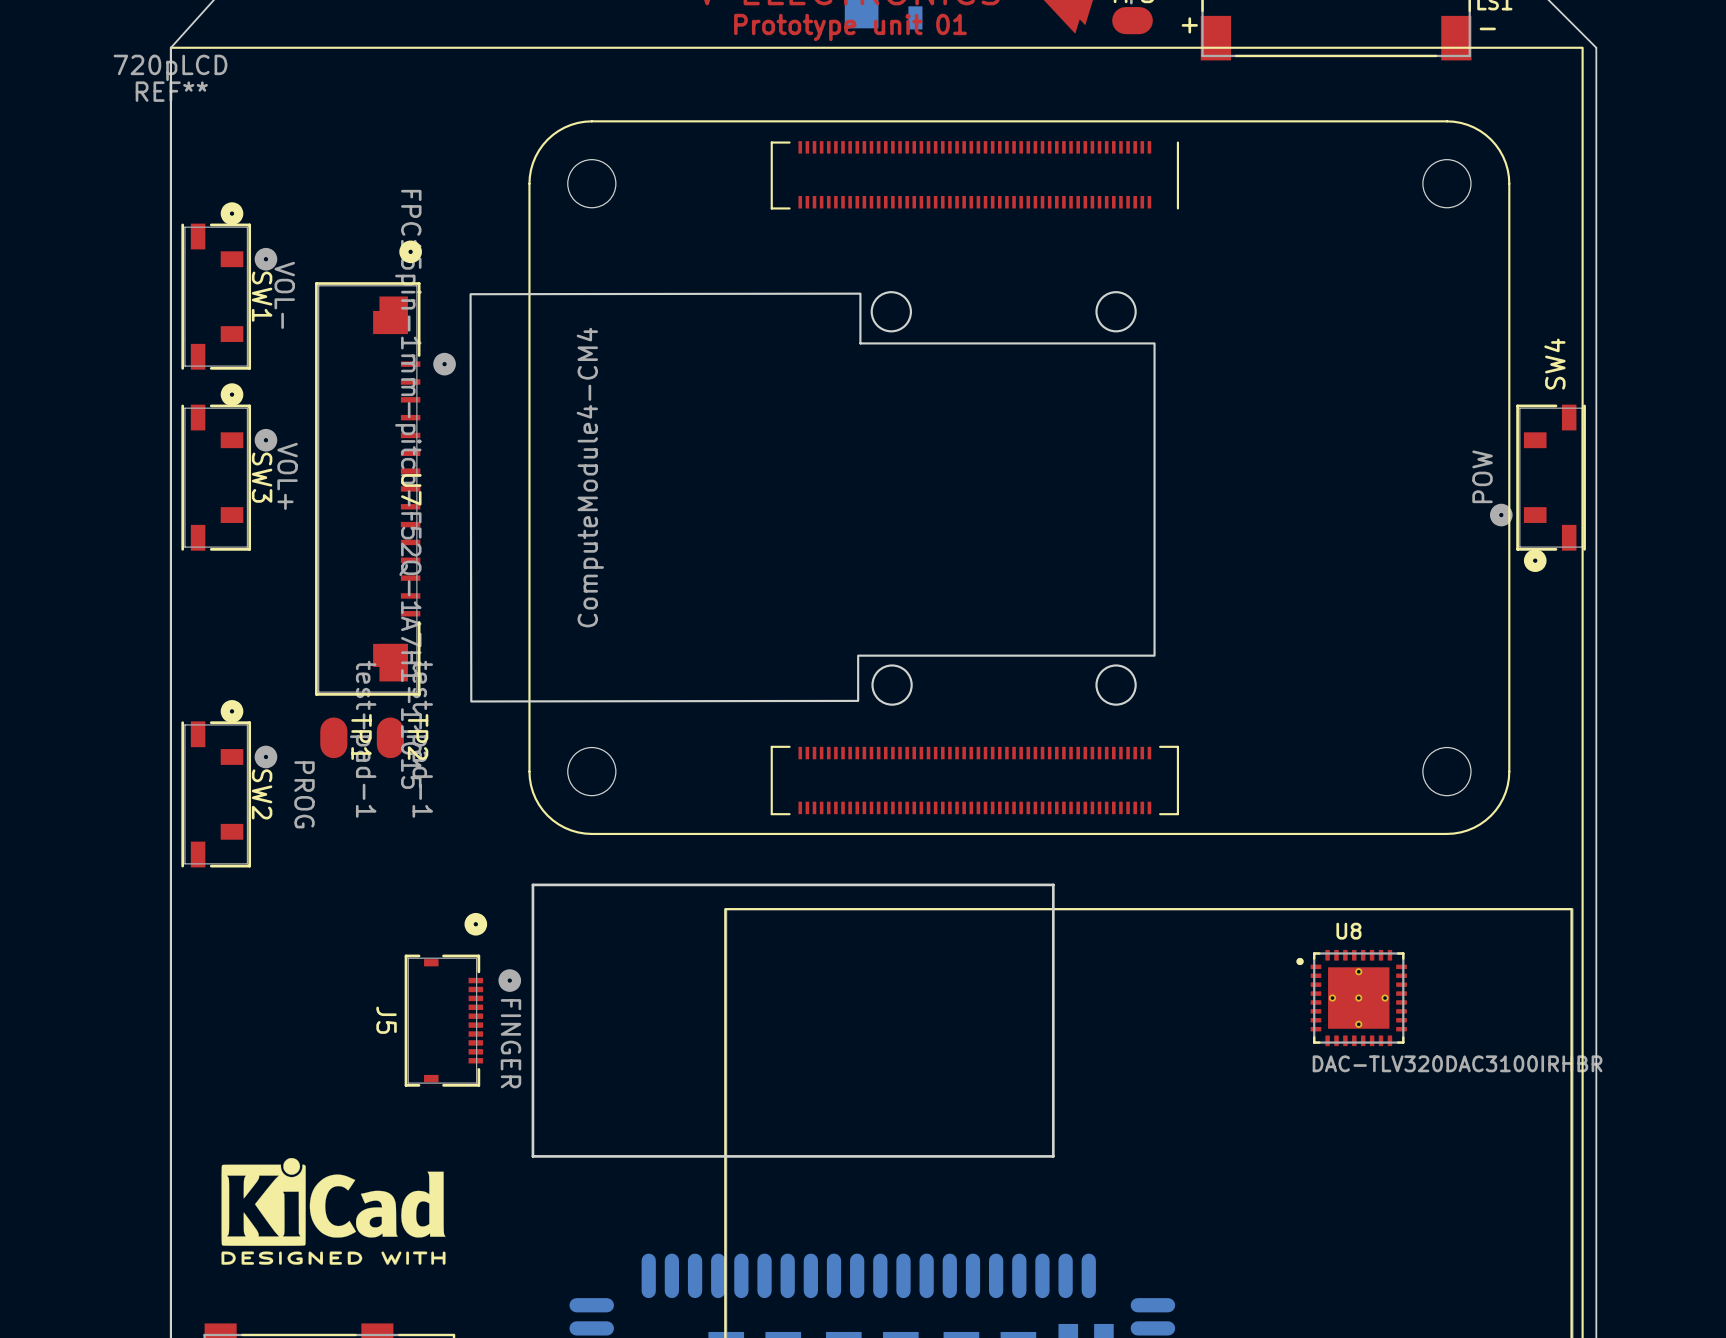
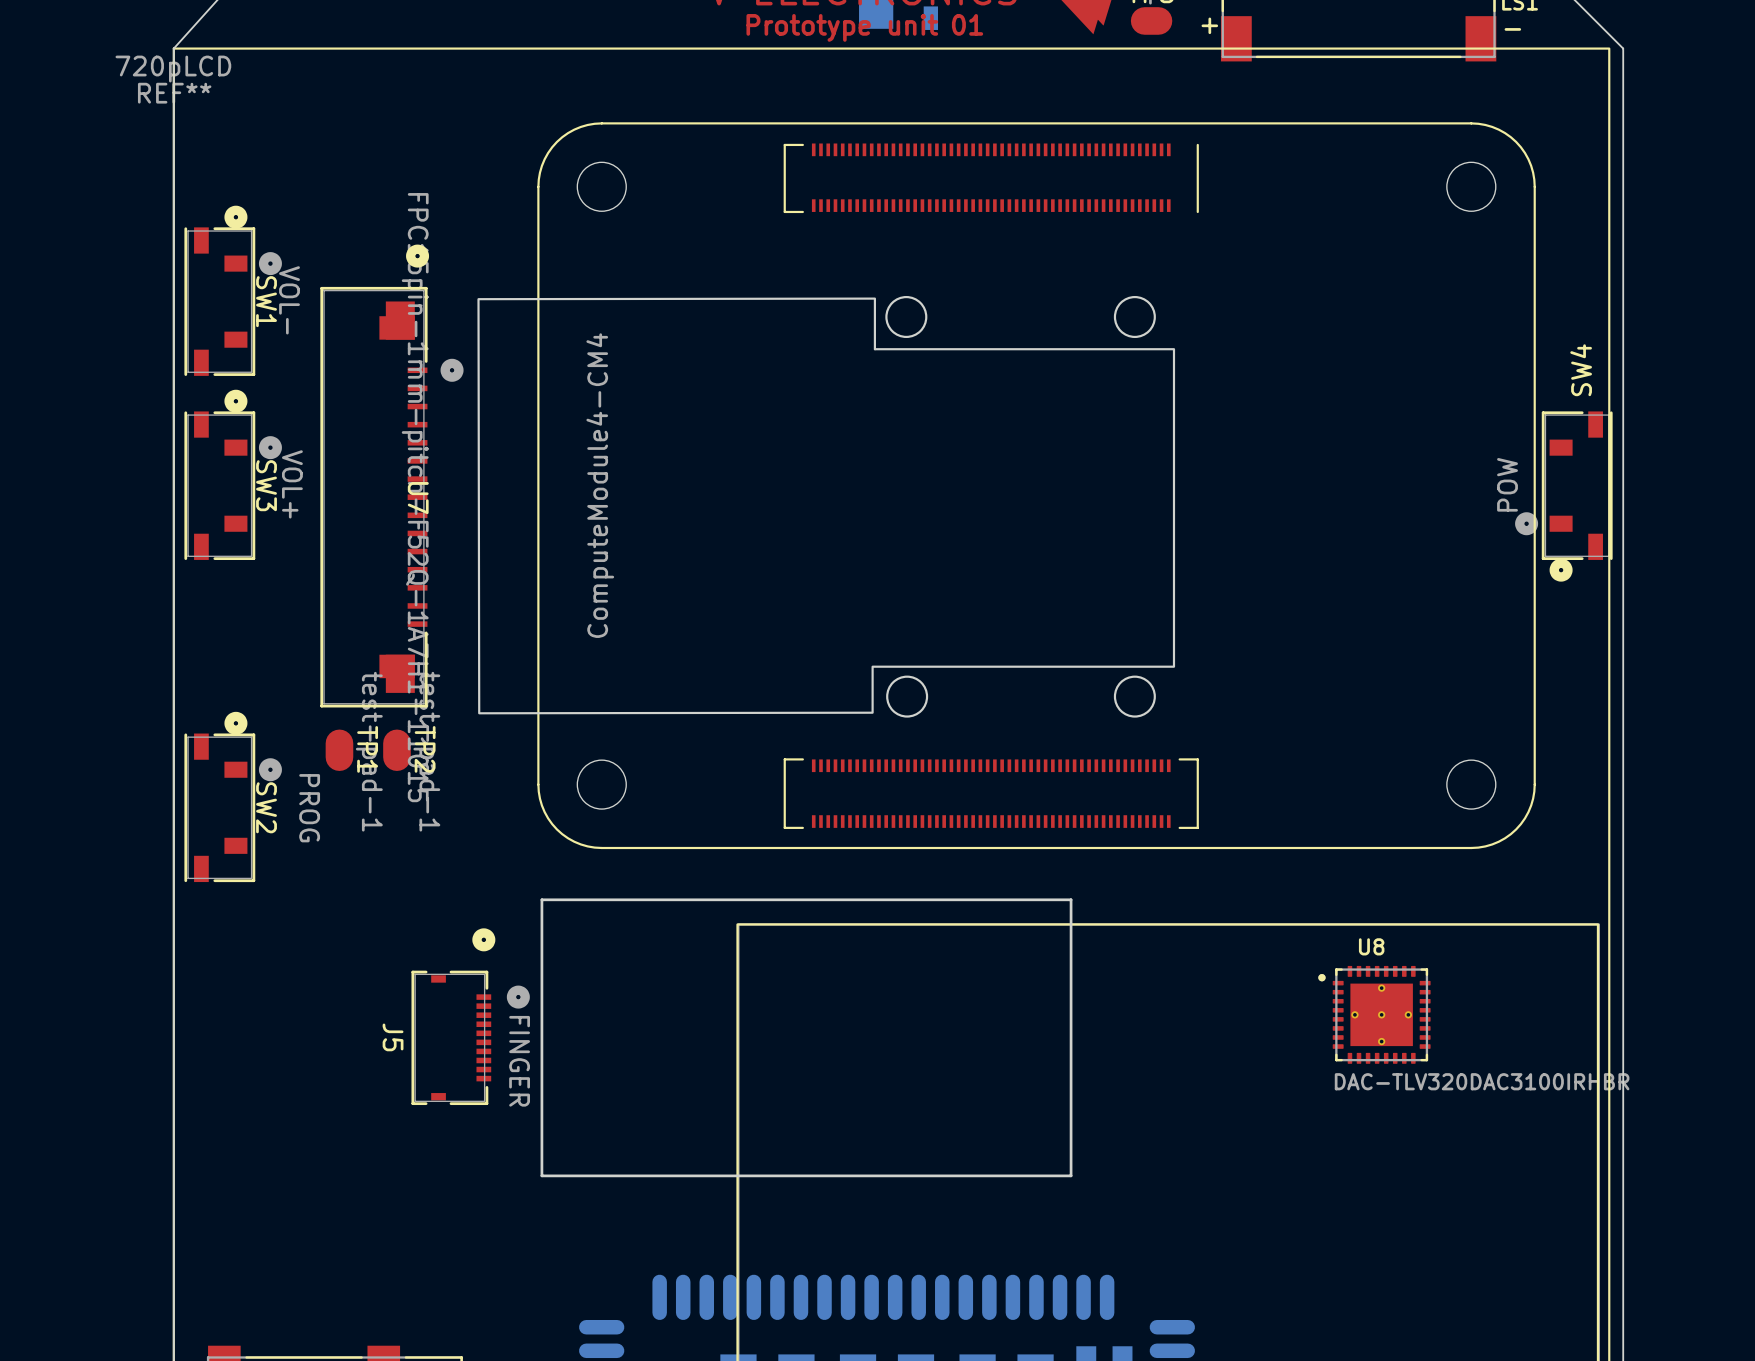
drawing: [221, 1158, 446, 1265] -> none

